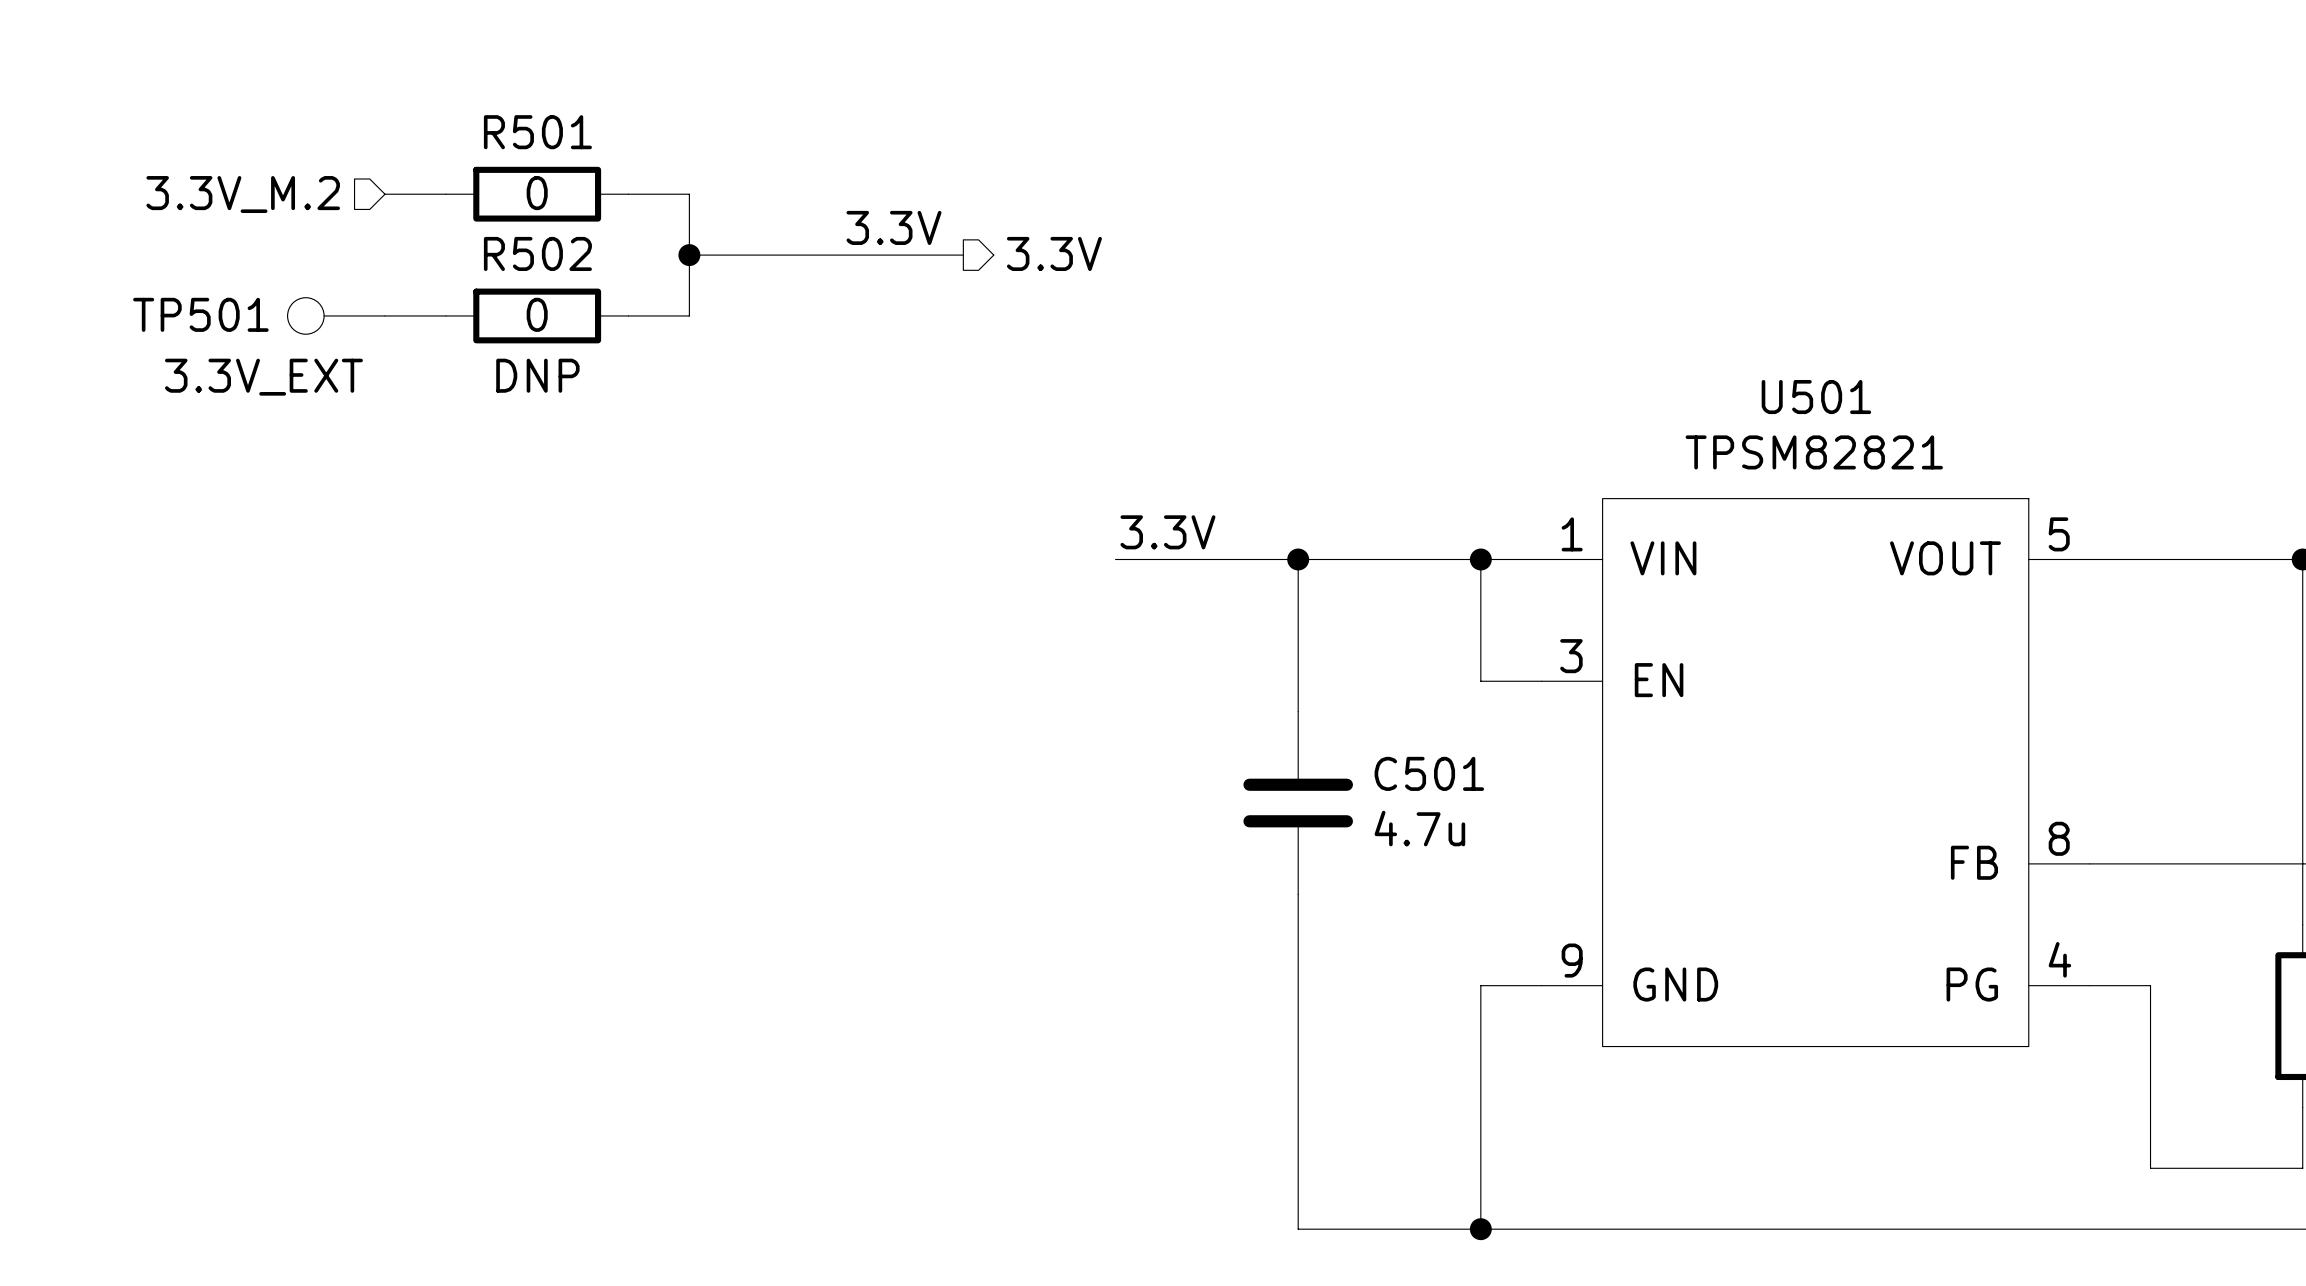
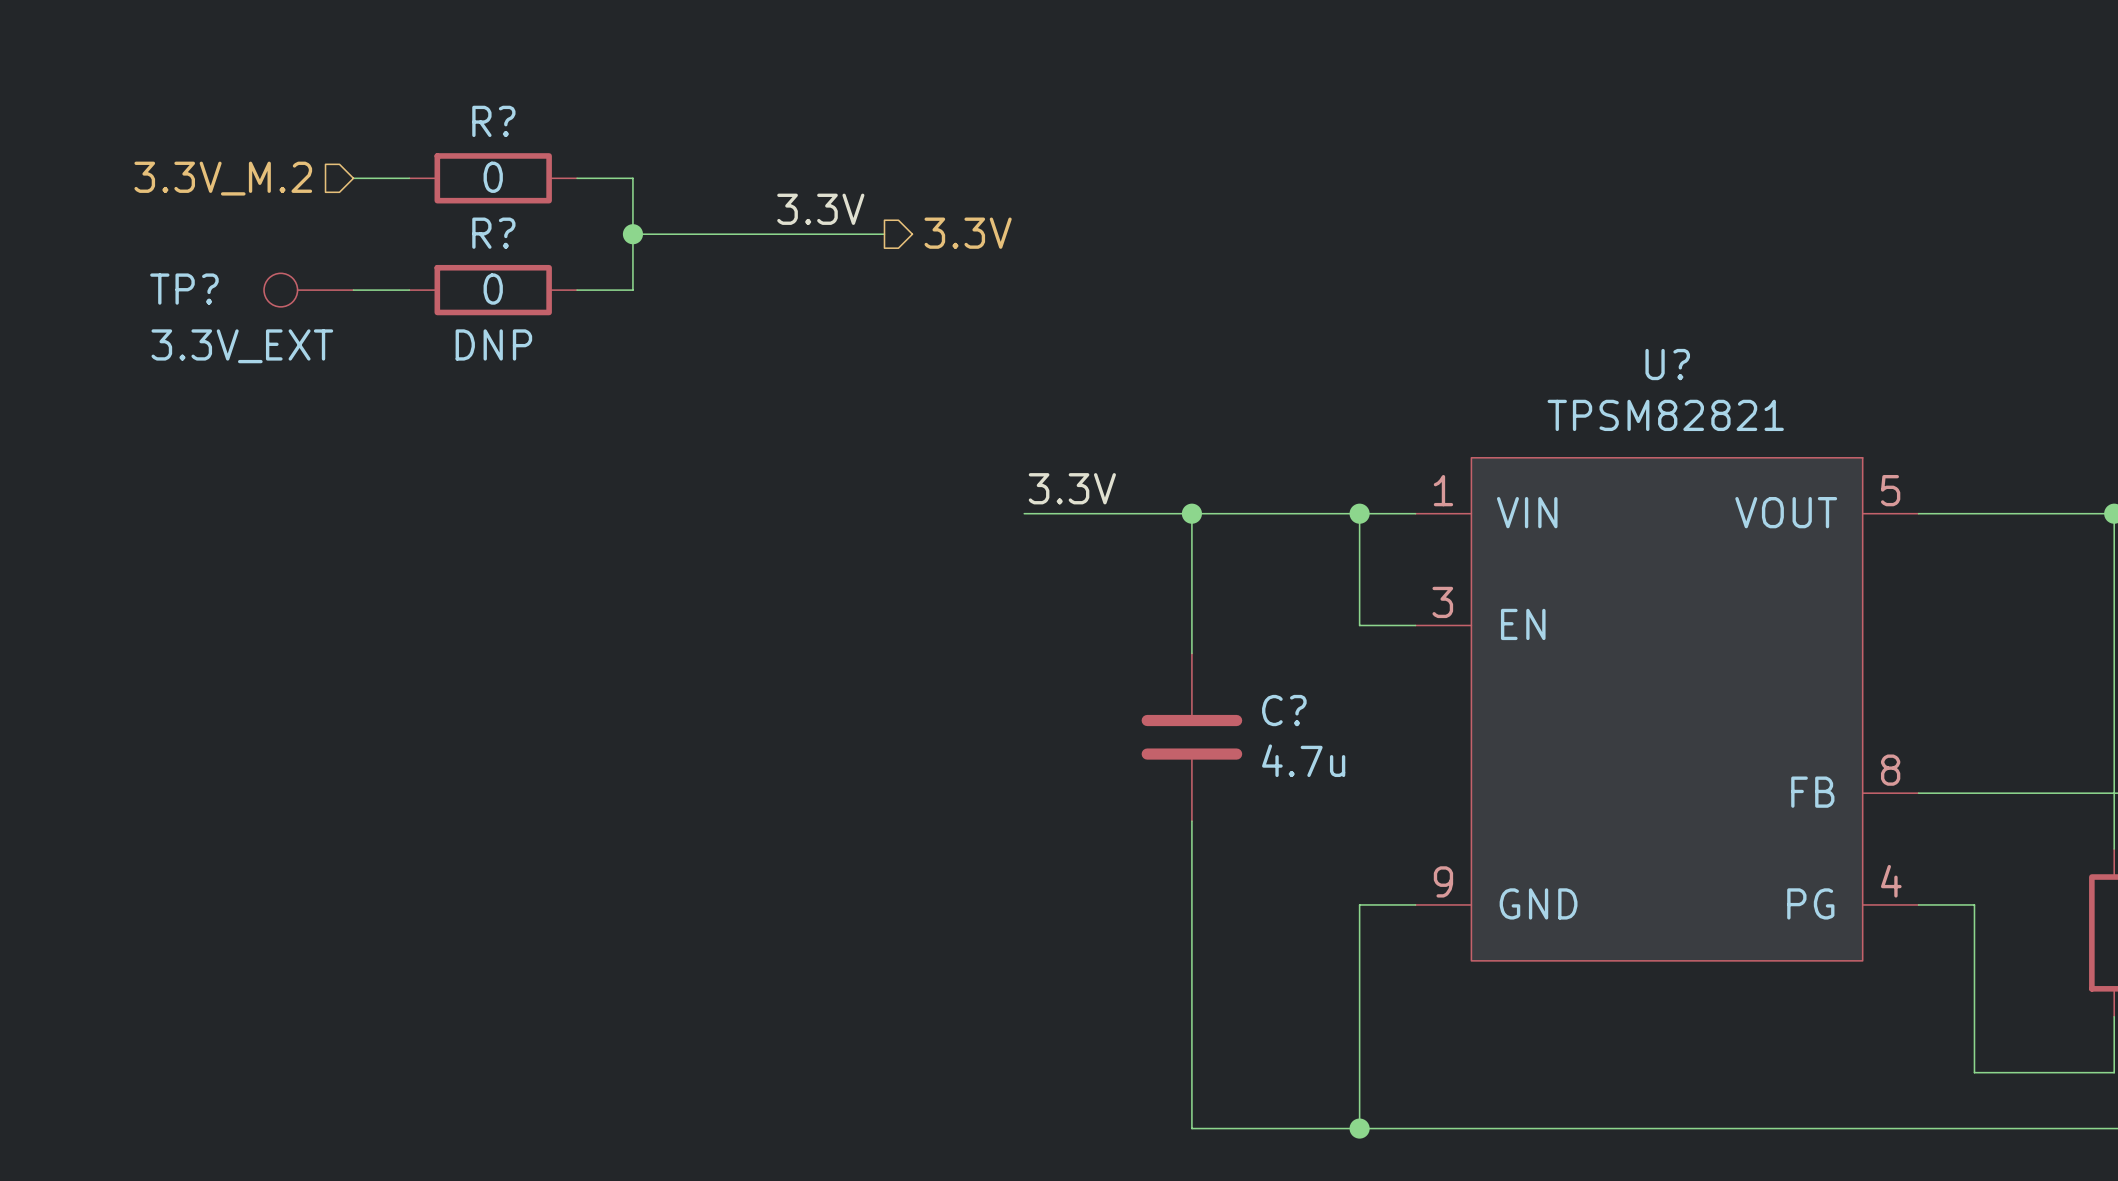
R501 name: R501 (537, 132) -> R? (493, 121)
R502 name: R502 (537, 253) -> R? (493, 233)
TP501 name: TP501 (200, 314) -> TP? (184, 289)
U501 name: U501 (1816, 397) -> U? (1667, 364)
C501 name: C501 (1429, 773) -> C? (1284, 710)

